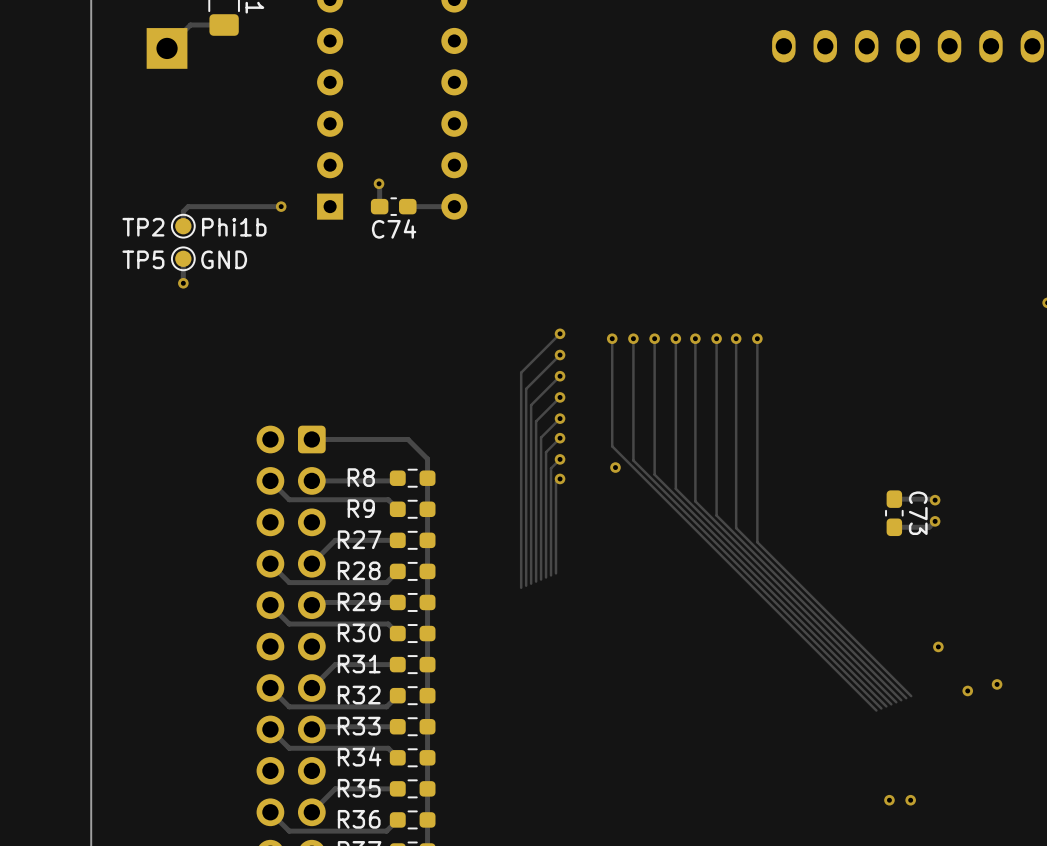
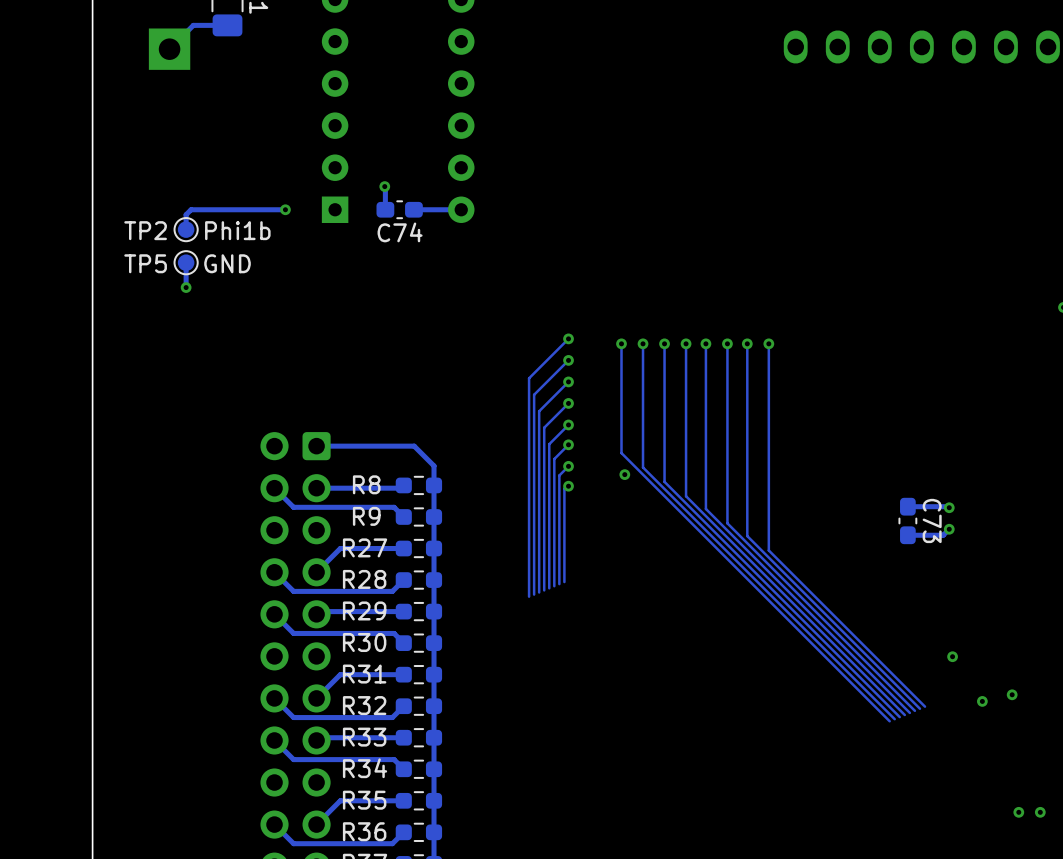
via: (889, 800) -> none
via: (910, 800) -> none
via: none -> (1018, 812)
via: none -> (1040, 812)

